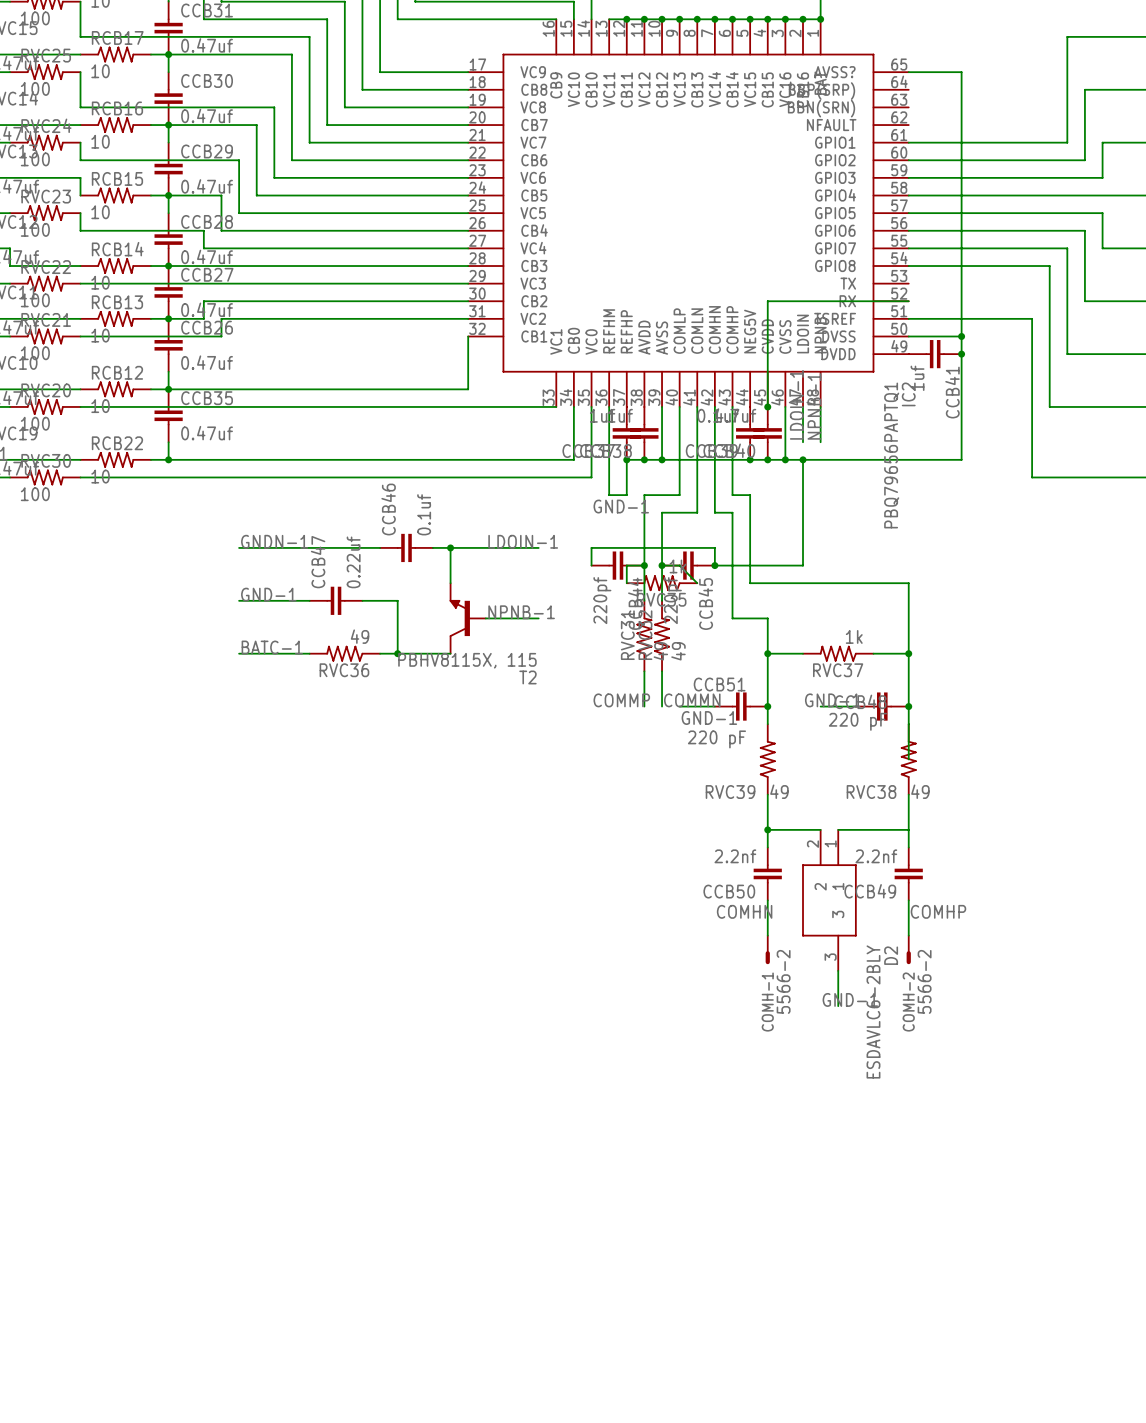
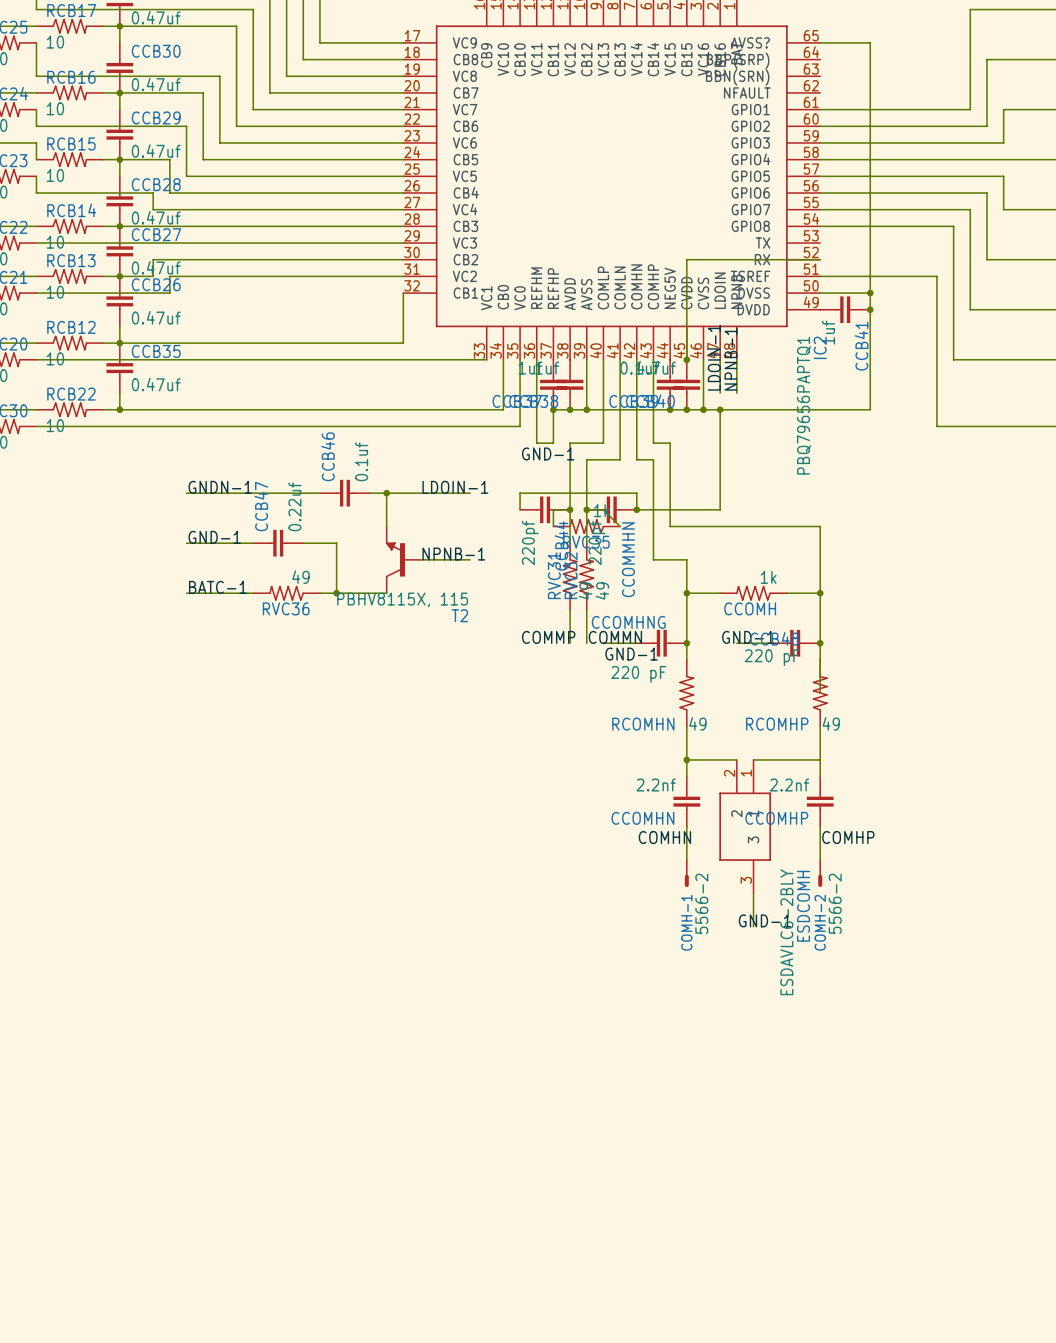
CCB45 name: CCB45 (705, 604) -> CCOMMHN (628, 559)
RVC37 name: RVC37 (838, 670) -> CCOMH (750, 608)
CCB51 name: CCB51 (719, 684) -> CCOMHNG (628, 622)
RVC39 name: RVC39 (730, 792) -> RCOMHN (643, 724)
RVC38 name: RVC38 (871, 792) -> RCOMHP (777, 724)
CCB50 name: CCB50 (729, 891) -> CCOMHN (642, 818)
CCB49 name: CCB49 (870, 891) -> CCOMHP (776, 818)
D2 name: D2 (891, 955) -> ESDCOMH (803, 906)

